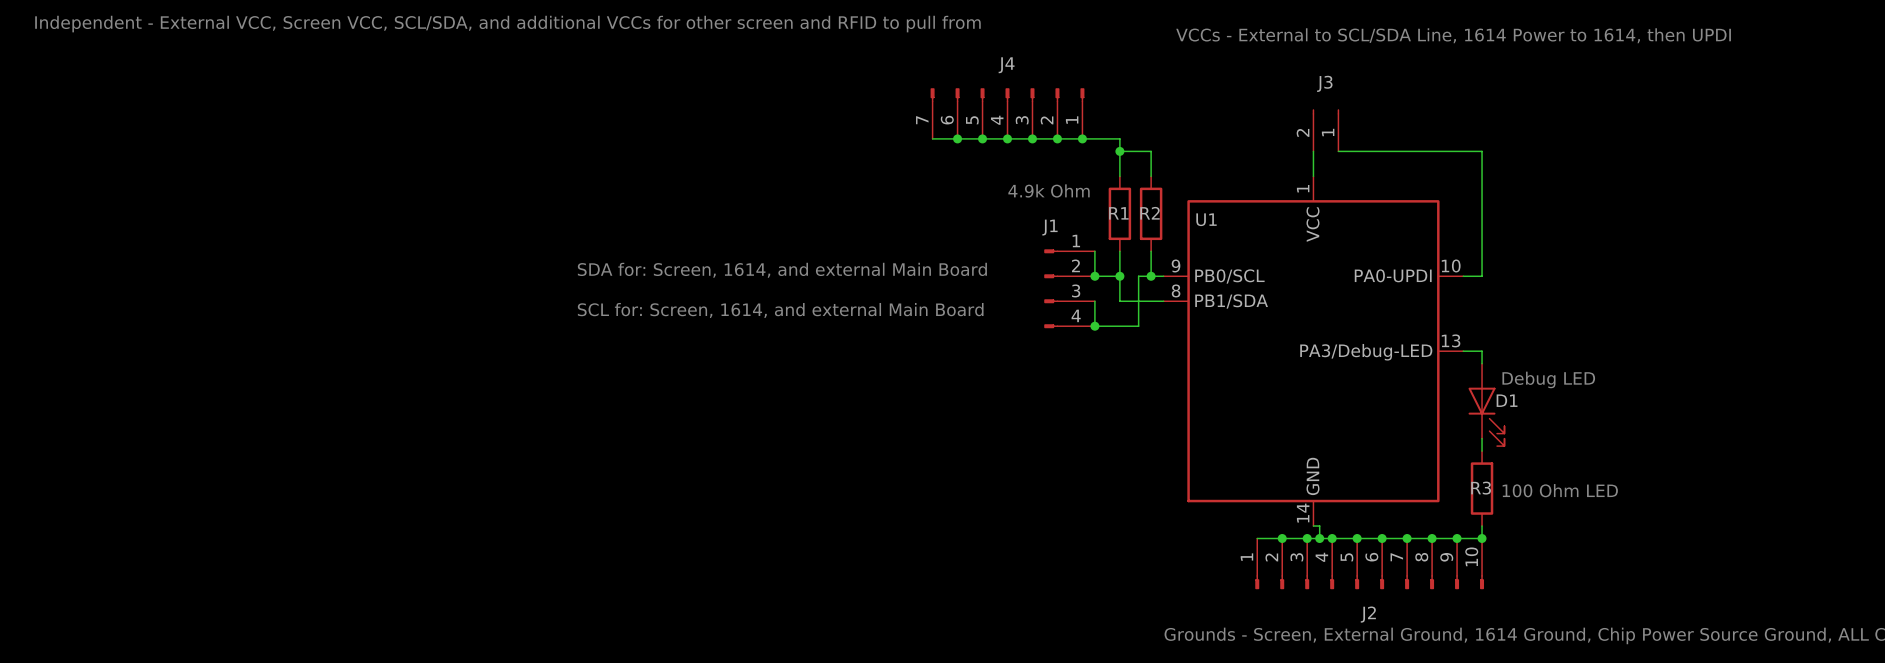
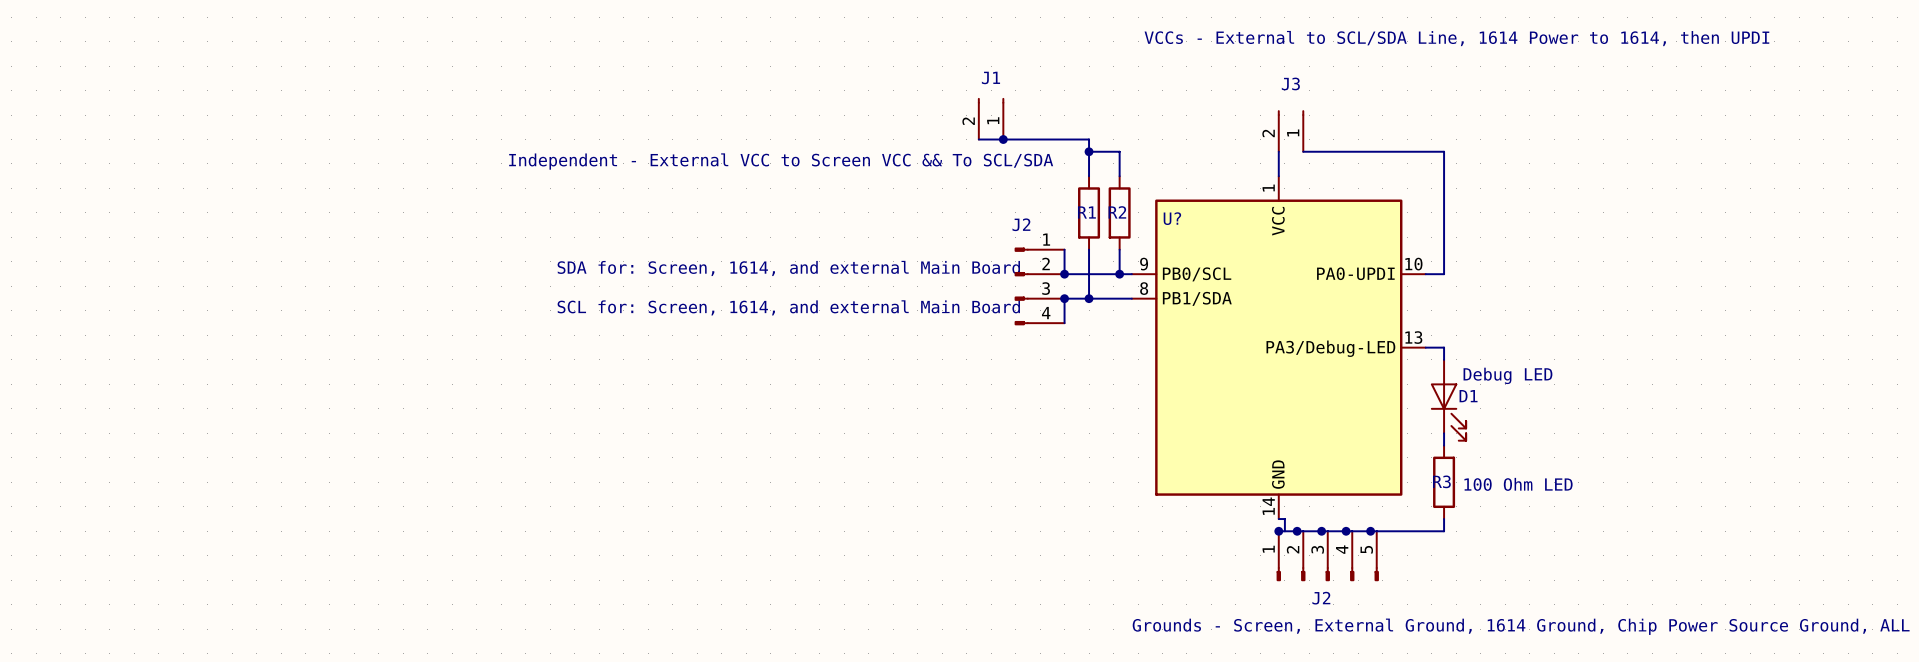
text: Independent - External VCC, Screen VCC, SCL/SDA, and additional VCCs for other screen and RFID to pull from (507, 24) -> none
J4: (1007, 113) -> none
J1: none -> (991, 118)
wire: (932, 138) (1007, 138) -> none
junction: (957, 138) -> none
junction: (982, 138) -> none
junction: (1007, 138) -> none
junction: (1057, 138) -> none
junction: (1082, 138) -> none
text: none -> Independent - External VCC to Screen VCC && To SCL/SDA (781, 161)
text: 4.9k Ohm (1049, 190) -> none
U1 name: U1 (1206, 219) -> U? (1172, 218)
J1 name: J1 (1049, 227) -> J2 (1021, 224)
junction: (1119, 276) -> none
wire: (1138, 276) (1138, 326) (1094, 326) -> (1107, 274) (1089, 274)
wire: none -> (1064, 298) (1089, 298)
junction: none -> (1064, 298)
junction: none -> (1089, 298)
junction: (1094, 326) -> none
J2 symbol: [1255, 538, 1485, 590] -> [1276, 531, 1379, 581]
wire: (1257, 538) (1313, 538) -> none
junction: (1282, 538) -> none
junction: (1307, 538) -> none
junction: none -> (1278, 531)
junction: (1319, 538) -> none
junction: (1432, 538) -> none
junction: (1457, 538) -> none
junction: (1482, 538) -> none

